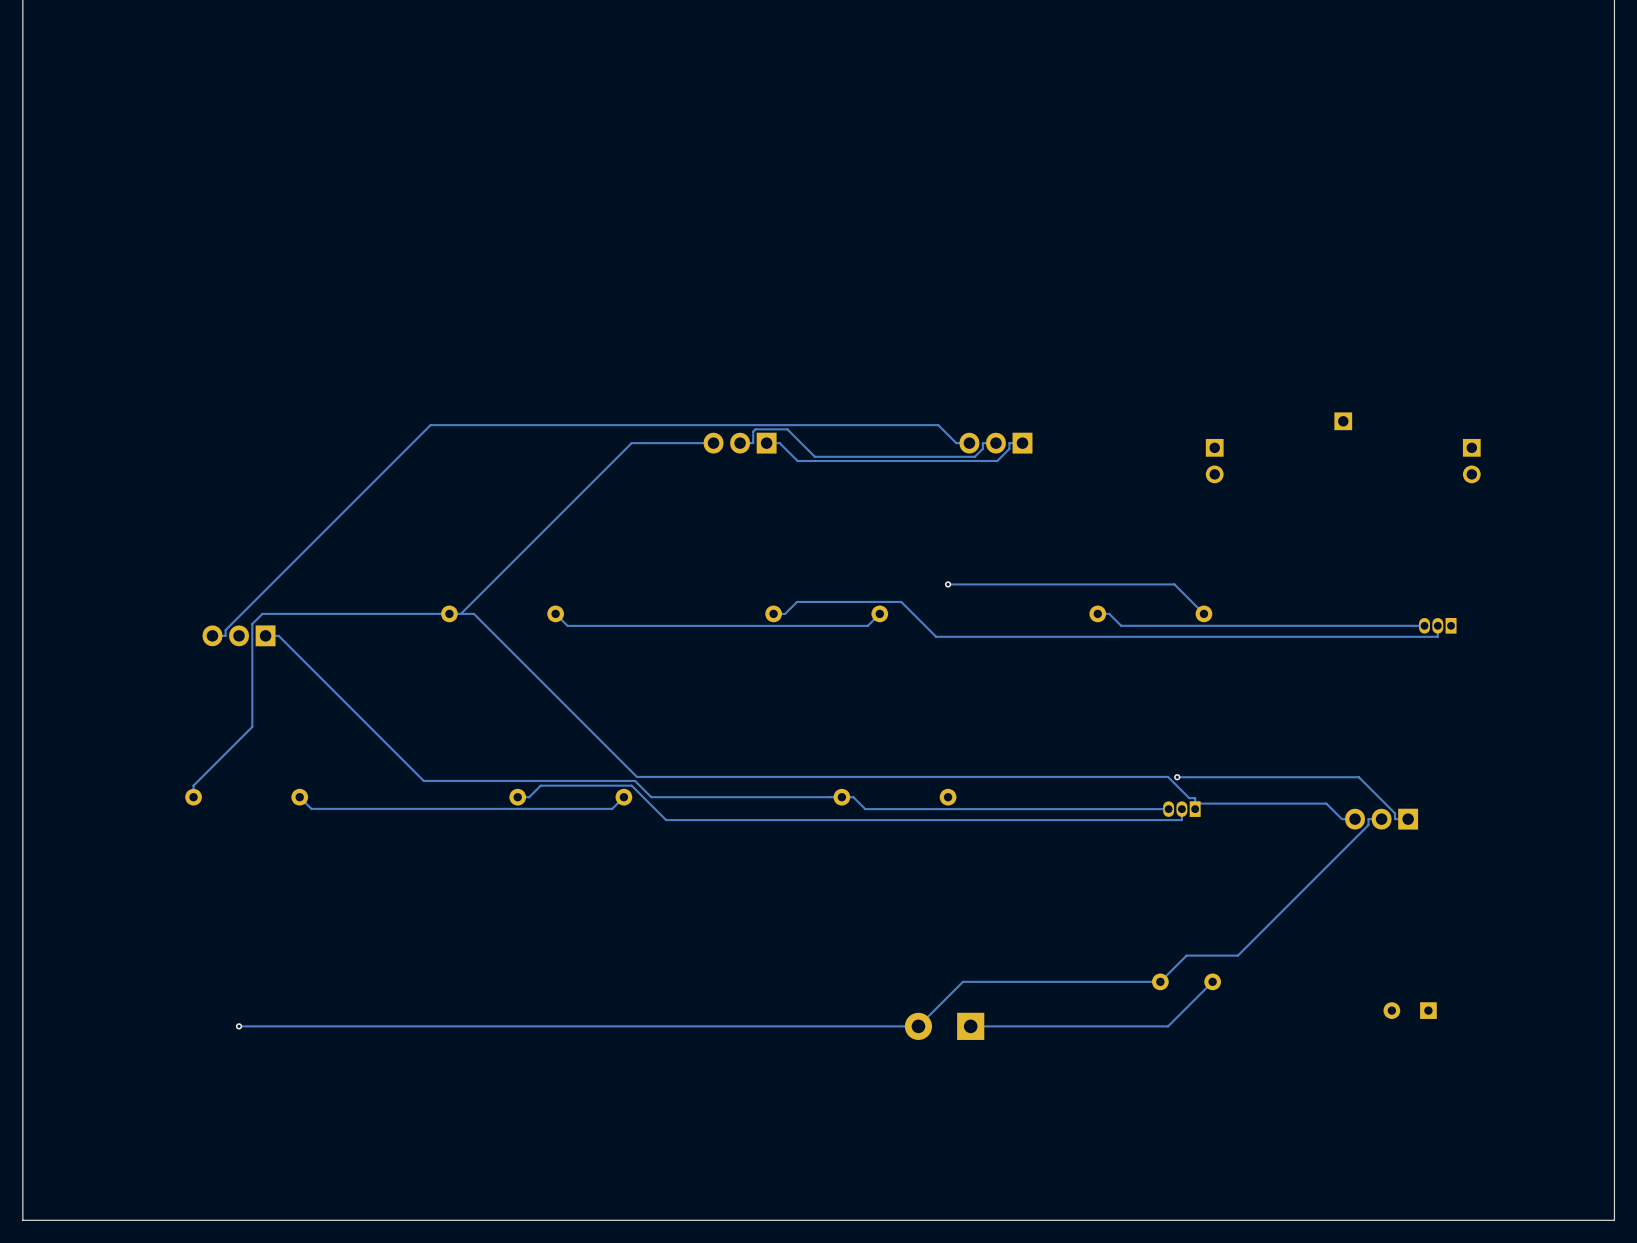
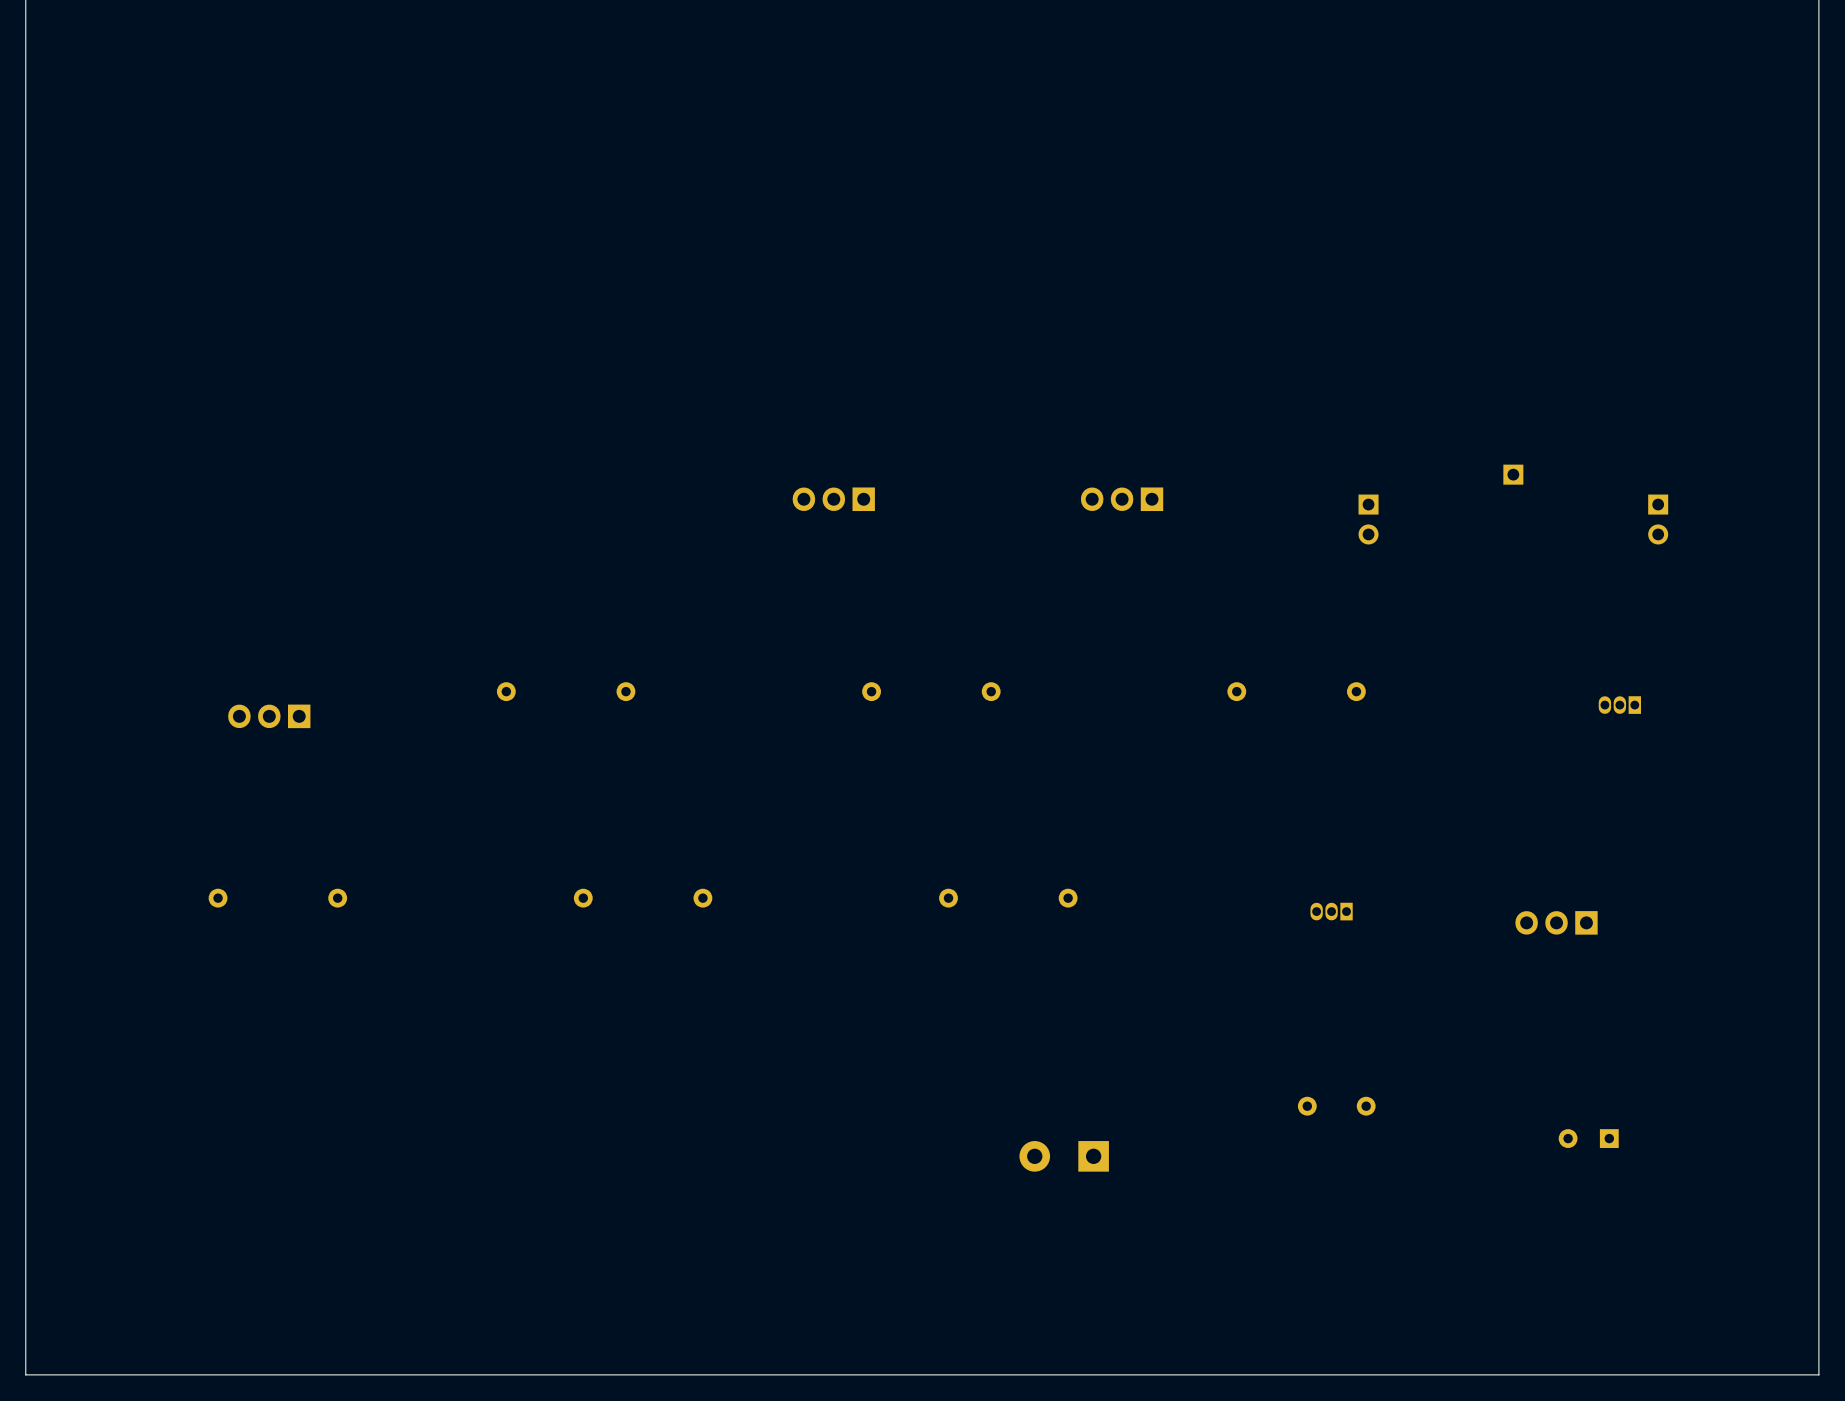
track: (713, 443) (631, 443) (460, 613) -> none
track: (969, 443) (956, 443) (938, 425) (430, 425) (225, 630) (225, 635) (212, 635) -> none
track: (995, 443) (982, 443) (982, 448) (974, 456) (814, 456) (787, 429) (755, 429) (753, 431) (753, 443) (740, 443) -> none
track: (1022, 443) (1009, 443) (1009, 448) (997, 460) (797, 460) (779, 443) (766, 443) -> none
track: (948, 584) (1174, 584) (1203, 613) -> none
via: (948, 584) -> none
track: (773, 613) (785, 613) (797, 601) (901, 601) (936, 636) (1437, 636) (1437, 625) -> none
track: (879, 613) (867, 625) (567, 625) (555, 613) -> none
track: (1097, 613) (1109, 613) (1121, 625) (1424, 625) -> none
track: (265, 635) (278, 635) (423, 780) (635, 780) (651, 797) (853, 797) (865, 809) (1168, 809) -> none
track: (1177, 777) (1358, 777) (1395, 813) (1395, 819) (1408, 819) -> none
via: (1177, 777) -> none
track: (193, 797) (193, 785) (252, 726) (252, 624) (262, 613) (473, 613) (636, 776) (1168, 776) (1189, 798) (1195, 798) (1195, 809) -> none
track: (517, 797) (529, 797) (540, 785) (631, 785) (666, 820) (1181, 820) (1181, 809) -> none
track: (623, 797) (612, 808) (311, 808) (299, 797) -> none
track: (1195, 803) (1326, 803) (1341, 819) (1355, 819) -> none
track: (1381, 819) (1368, 819) (1368, 825) (1237, 955) (1186, 955) (1160, 981) (962, 981) (918, 1026) (239, 1026) -> none
track: (1212, 981) (1168, 1026) (970, 1026) -> none
via: (239, 1026) -> none

